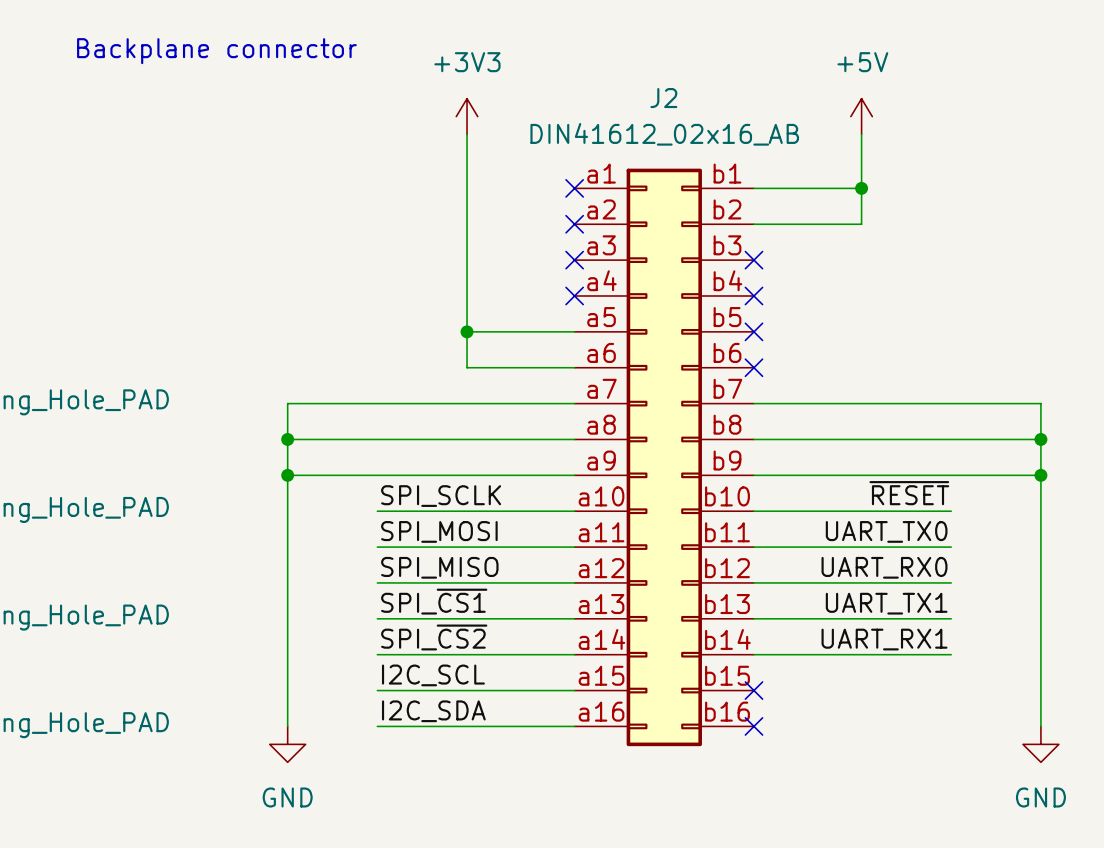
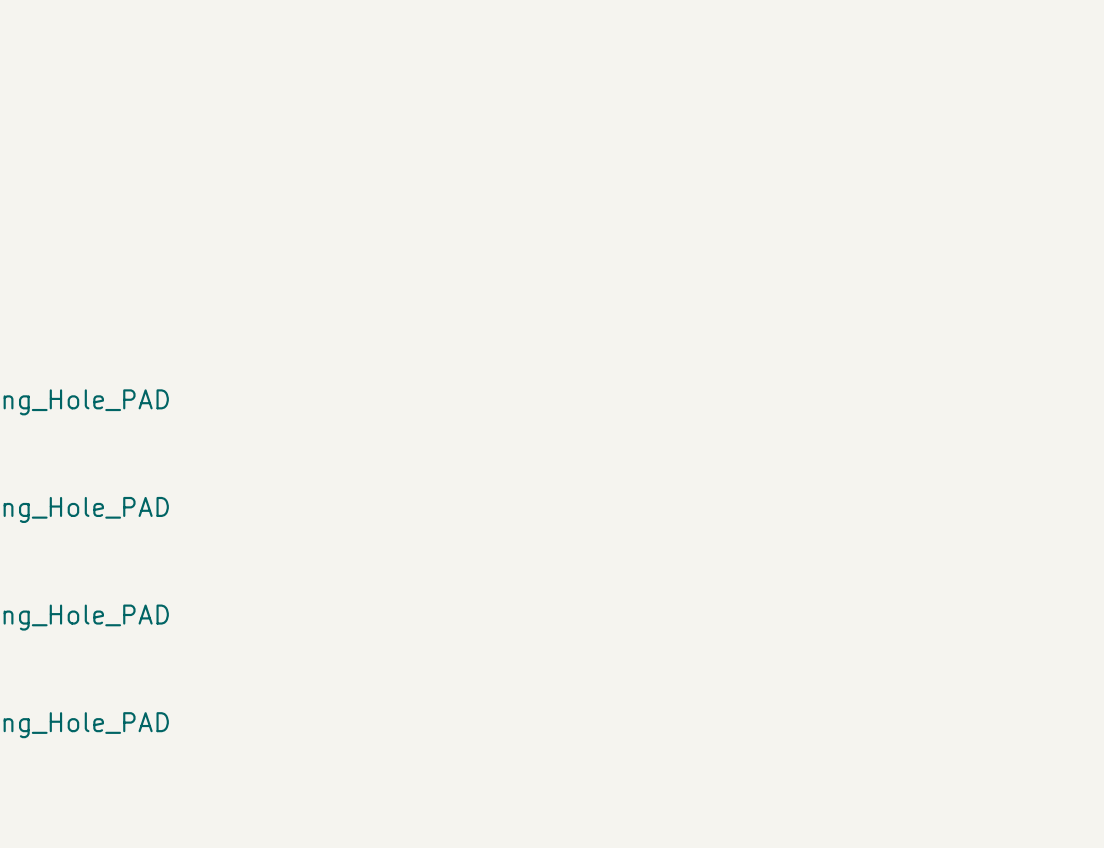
text: Backplane connector (216, 51) -> none
power symbol: +3V3 (467, 116) -> none
power symbol: +5V (861, 116) -> none
wire: (467, 134) (467, 367) (574, 367) -> none
wire: (861, 134) (861, 224) (753, 224) -> none
no-connect mark: (574, 188) -> none
wire: (753, 188) (861, 188) -> none
junction: (861, 188) -> none
no-connect mark: (574, 224) -> none
no-connect mark: (574, 260) -> none
no-connect mark: (753, 260) -> none
no-connect mark: (574, 295) -> none
no-connect mark: (753, 295) -> none
wire: (467, 331) (574, 331) -> none
junction: (467, 331) -> none
no-connect mark: (753, 331) -> none
no-connect mark: (753, 367) -> none
wire: (574, 403) (287, 403) (287, 726) -> none
wire: (753, 403) (1040, 403) (1040, 726) -> none
wire: (287, 439) (574, 439) -> none
junction: (287, 439) -> none
wire: (753, 439) (1040, 439) -> none
junction: (1040, 439) -> none
J2: DIN41612_02x16_AB (664, 457) -> none
wire: (287, 475) (574, 475) -> none
junction: (287, 475) -> none
wire: (753, 475) (1040, 475) -> none
junction: (1040, 475) -> none
label: ~{RESET} (909, 493) -> none
label: SPI_SCLK (441, 496) -> none
wire: (377, 511) (574, 511) -> none
wire: (753, 511) (951, 511) -> none
label: SPI_MOSI (439, 531) -> none
label: UART_TX0 (886, 531) -> none
wire: (377, 547) (574, 547) -> none
wire: (753, 547) (951, 547) -> none
label: SPI_MISO (439, 567) -> none
label: UART_RX0 (884, 567) -> none
wire: (377, 582) (574, 582) -> none
wire: (753, 582) (951, 582) -> none
label: SPI_~{CS1} (434, 601) -> none
label: UART_TX1 (886, 603) -> none
wire: (377, 618) (574, 618) -> none
wire: (753, 618) (951, 618) -> none
label: SPI_~{CS2} (434, 637) -> none
label: UART_RX1 (884, 639) -> none
wire: (377, 654) (574, 654) -> none
wire: (753, 654) (951, 654) -> none
label: I2C_SCL (433, 675) -> none
wire: (377, 690) (574, 690) -> none
no-connect mark: (753, 690) -> none
label: I2C_SDA (433, 711) -> none
wire: (377, 726) (574, 726) -> none
no-connect mark: (753, 726) -> none
power symbol: GND (287, 744) -> none
power symbol: GND (1040, 744) -> none

